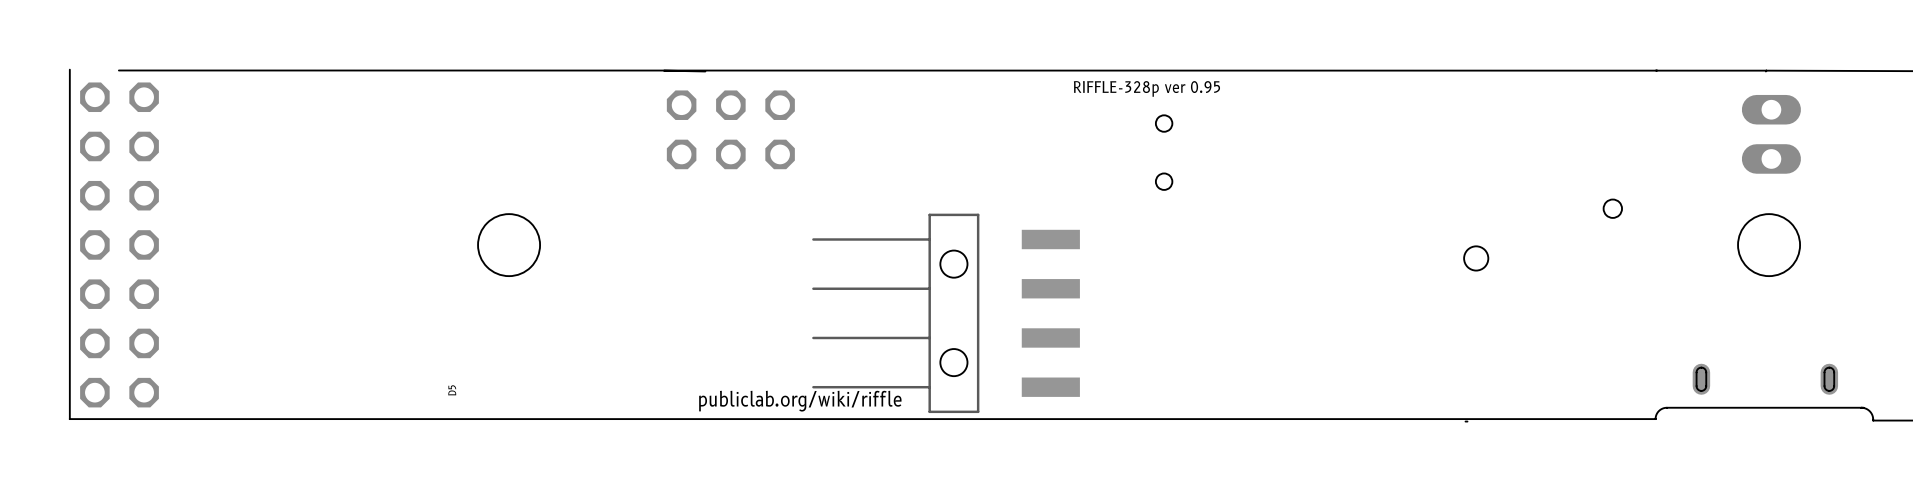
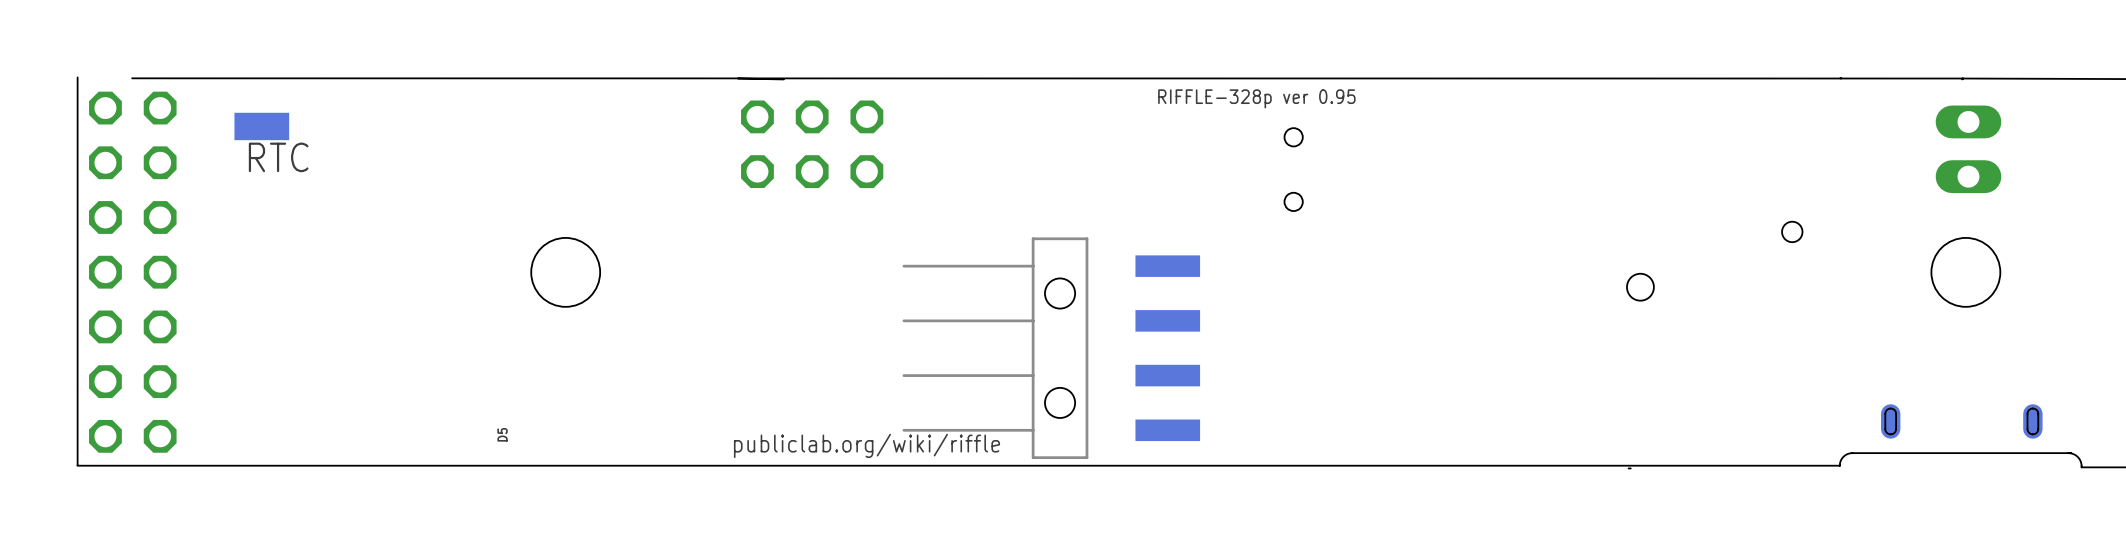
RTC: none -> (261, 126)

